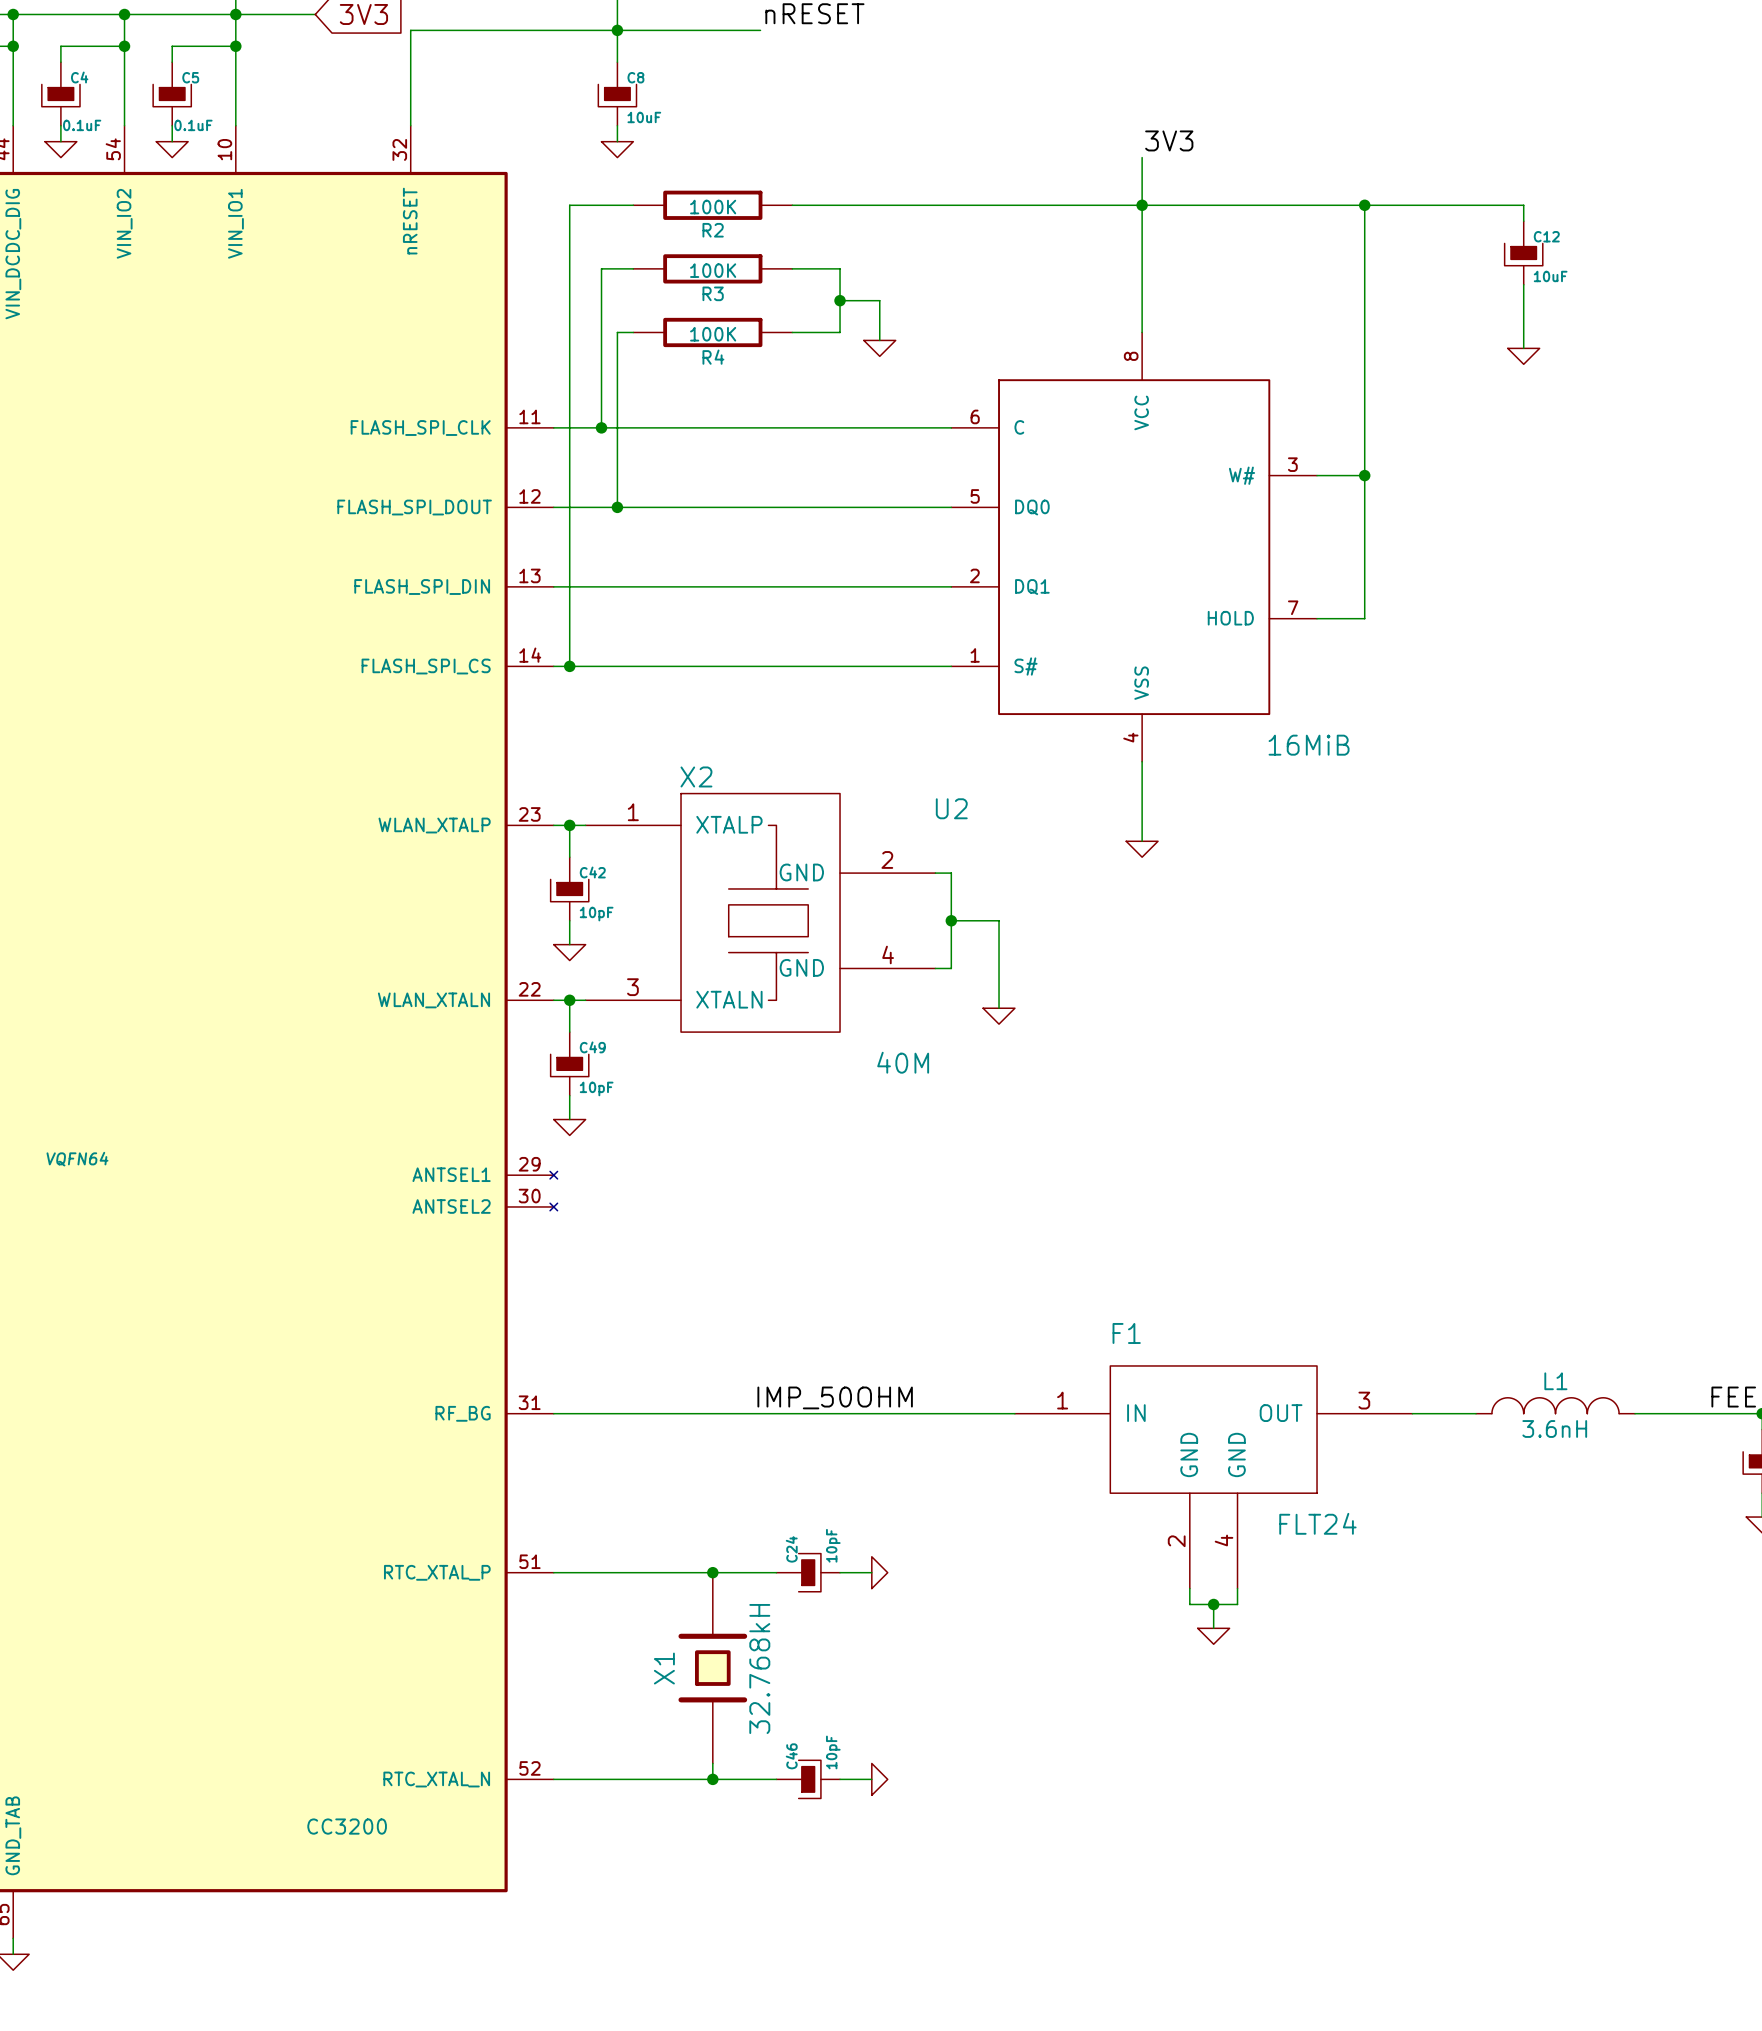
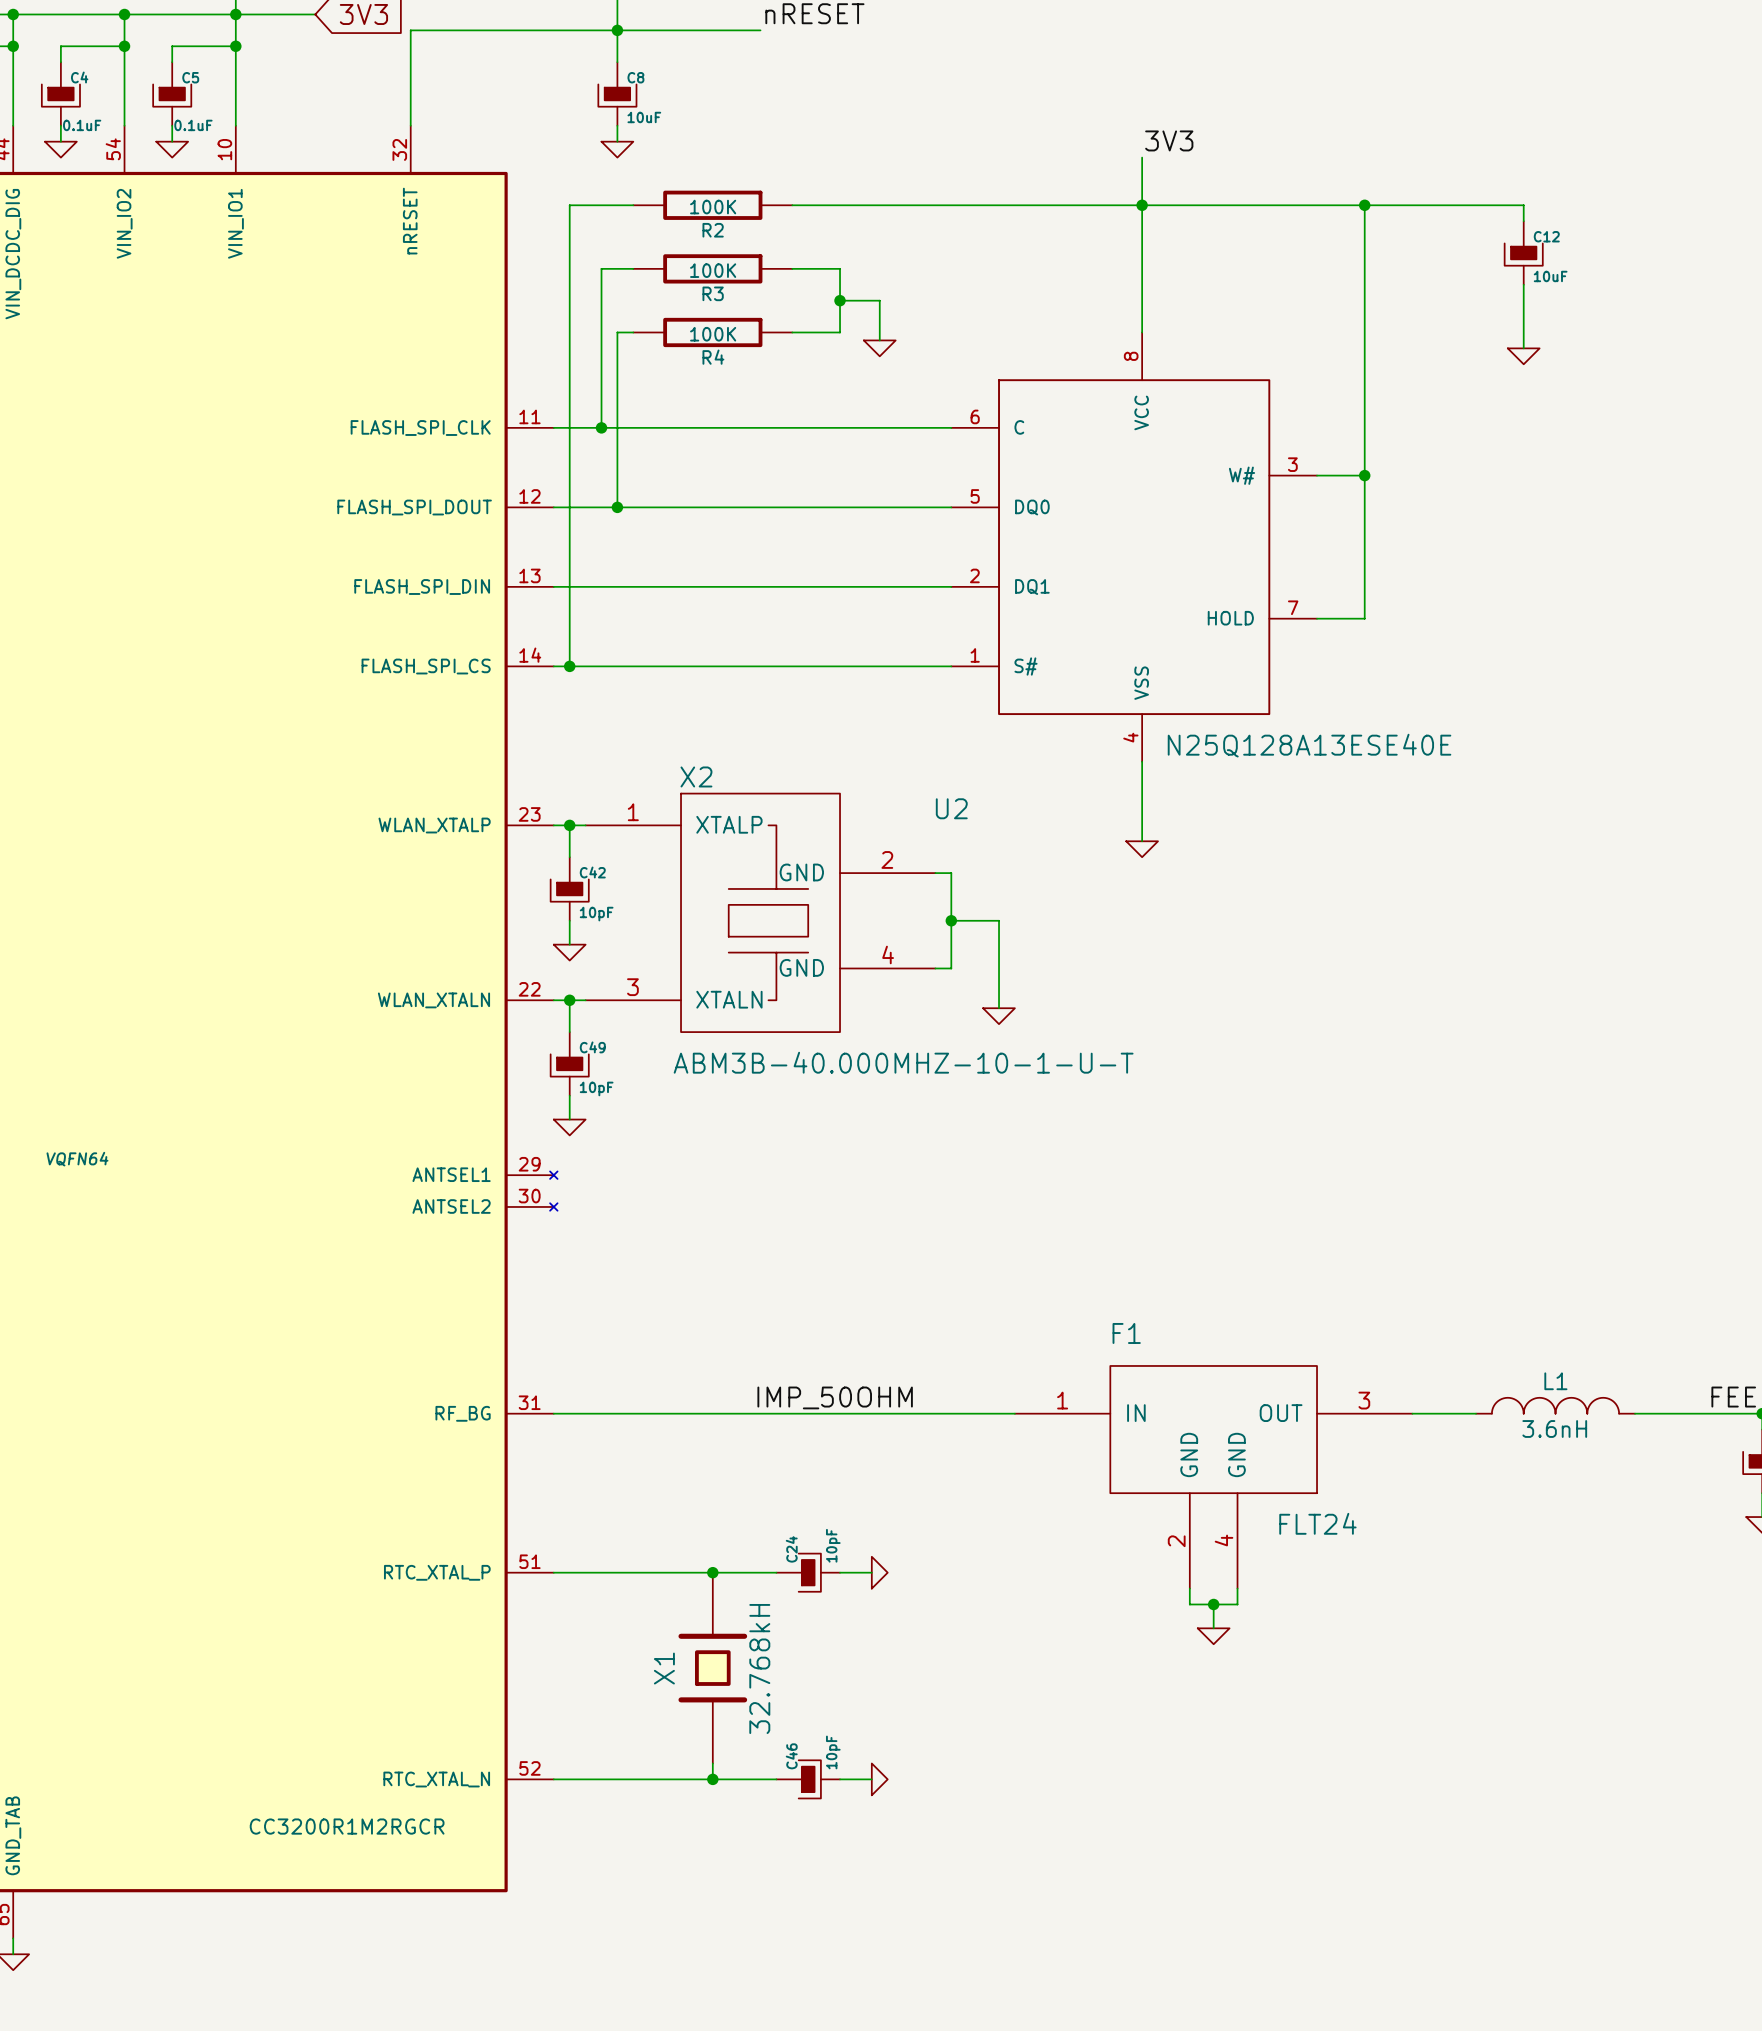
U2 value: 16MiB (1309, 745) -> N25Q128A13ESE40E (1309, 745)
X2 value: 40M (903, 1062) -> ABM3B-40.000MHZ-10-1-U-T (903, 1062)
part value: CC3200 (347, 1826) -> CC3200R1M2RGCR (347, 1826)

